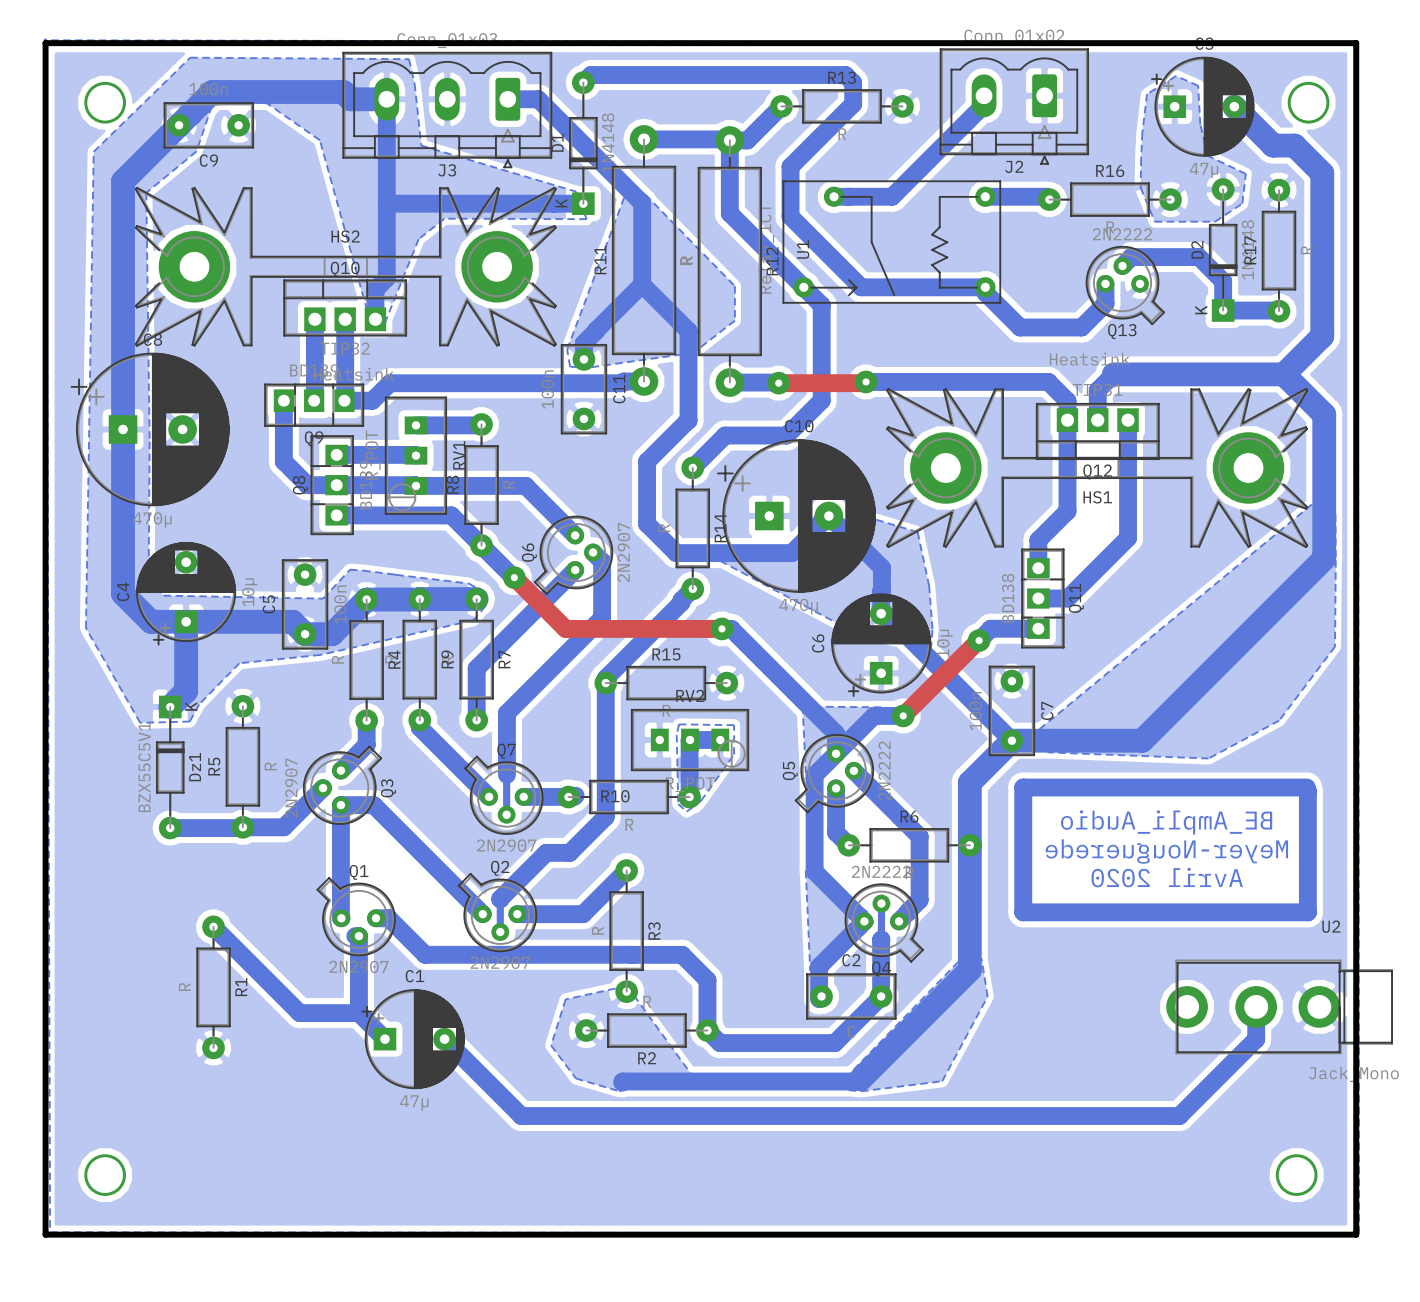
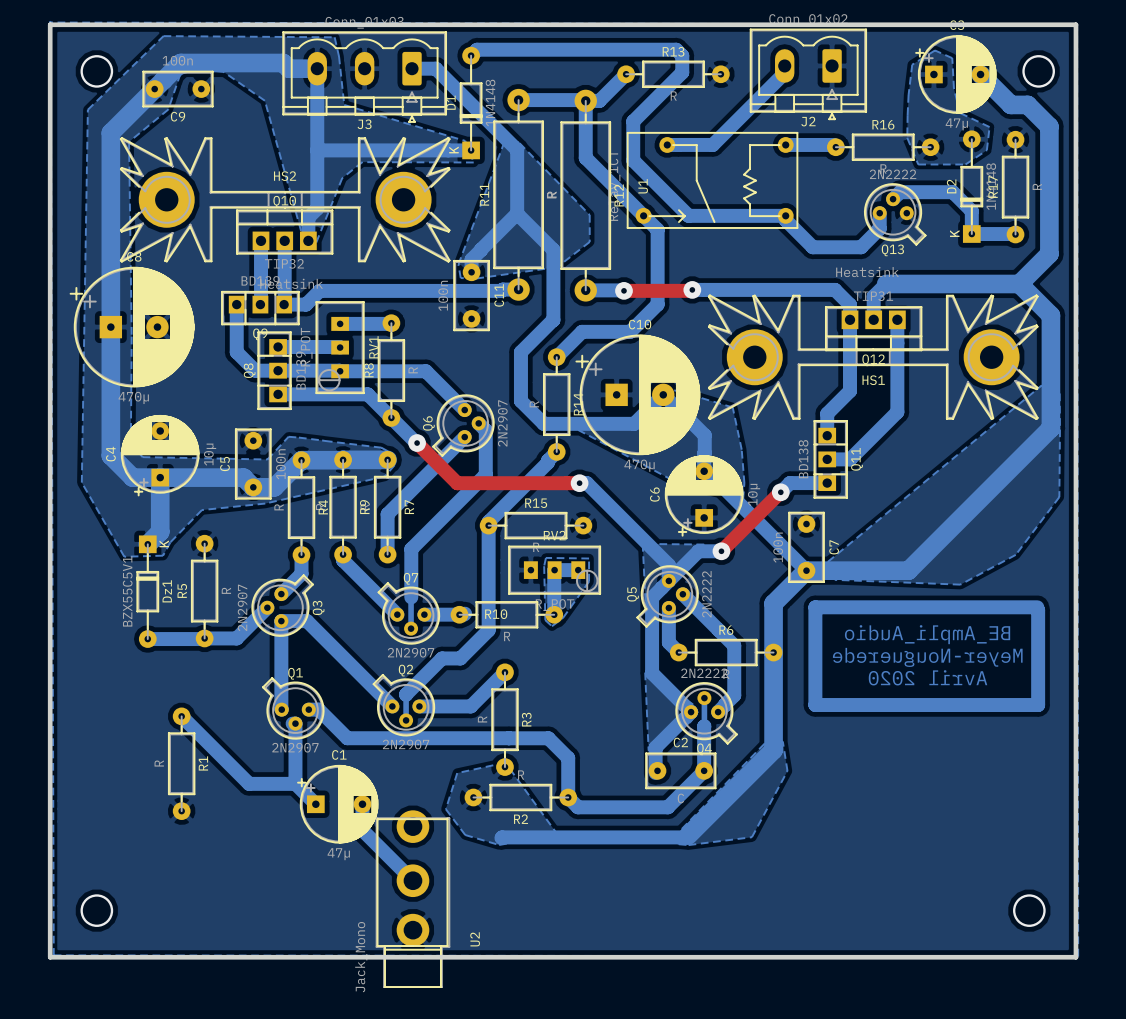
bottom track: (1256, 1006) (1256, 1039) (1179, 1116) (521, 1116) (444, 1039) -> (412, 880) (362, 830) (362, 804)
U2 rotation: 0° (1279, 1006) -> 90° clockwise (412, 899)
U2 position: (1279, 1006) -> (412, 899)

